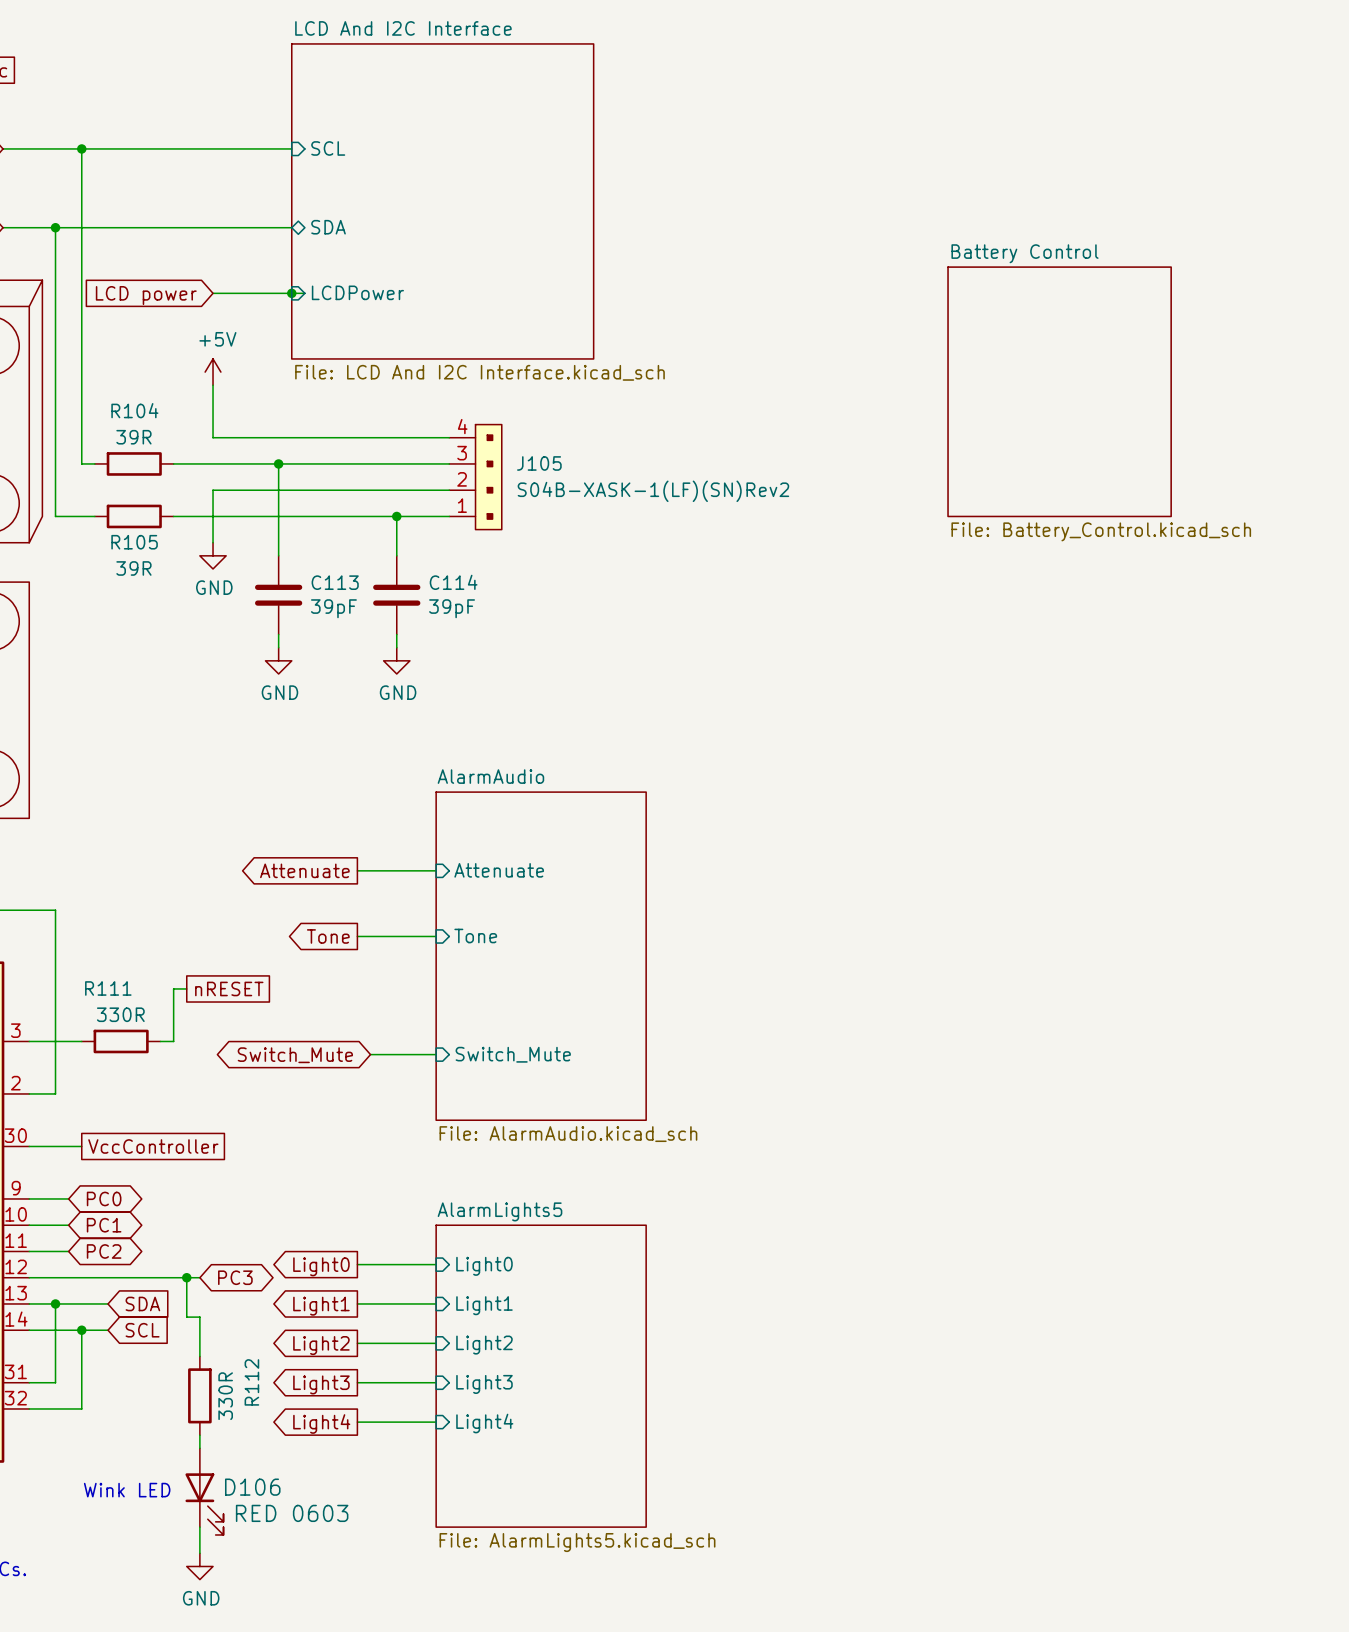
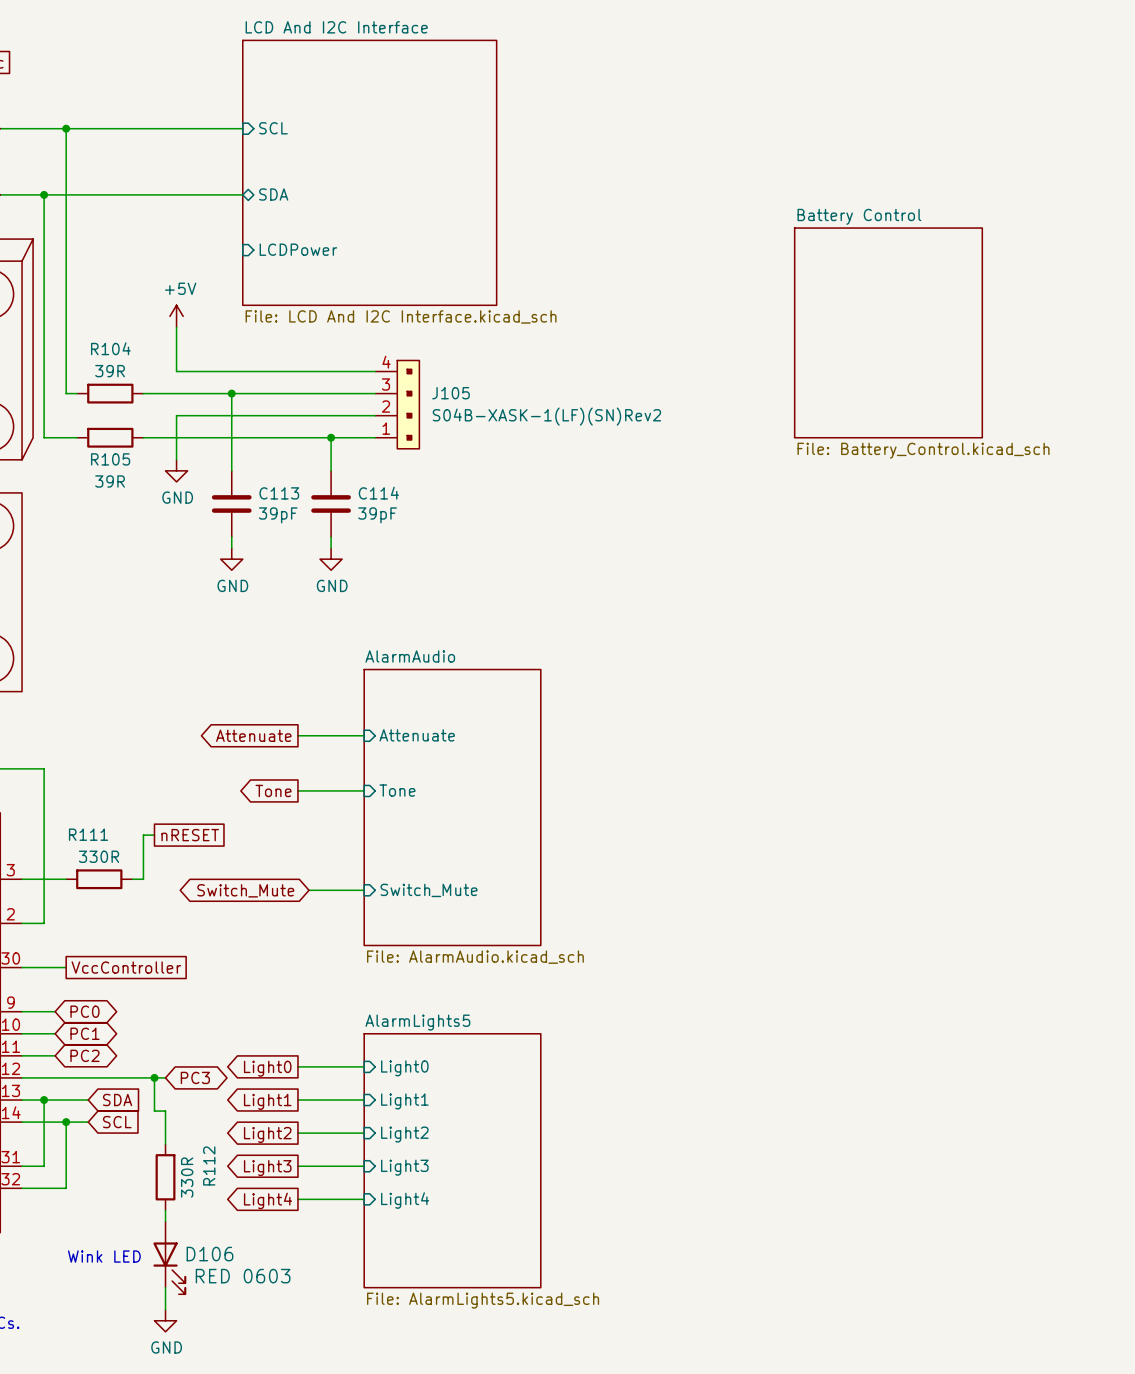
wire: (213, 293) (304, 293) -> none
junction: (291, 293) -> none
global label: LCD power (146, 295) -> none

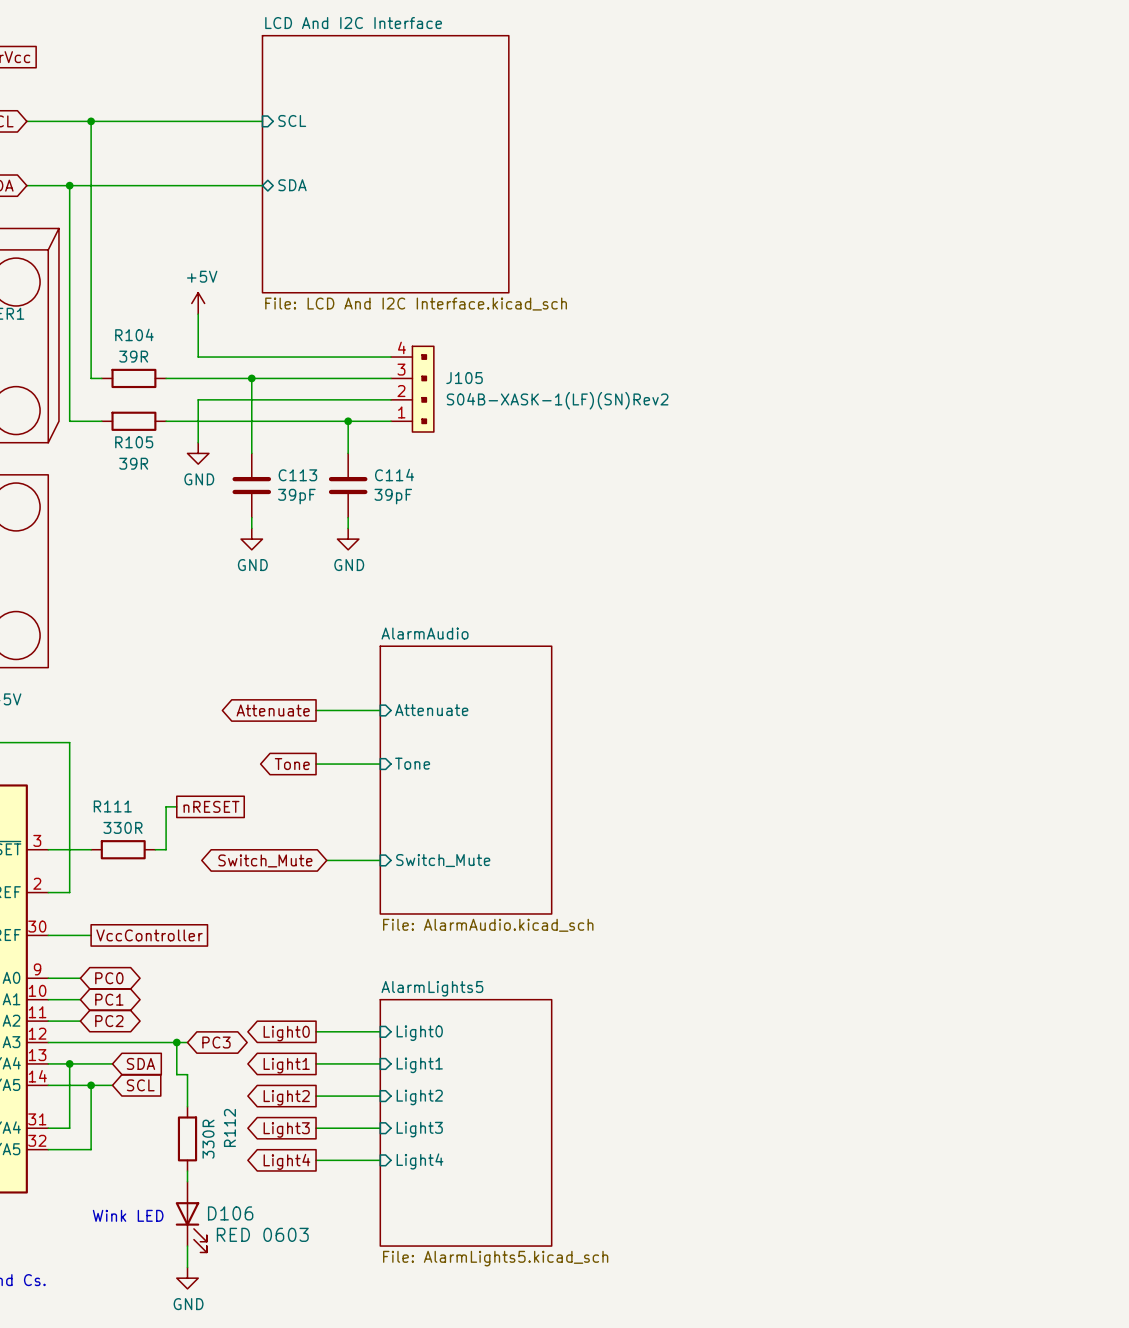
sheet pin: LCDPower (298, 249) -> none
sheet Battery Control: File: Battery_Control.kicad_sch (888, 332) -> none

